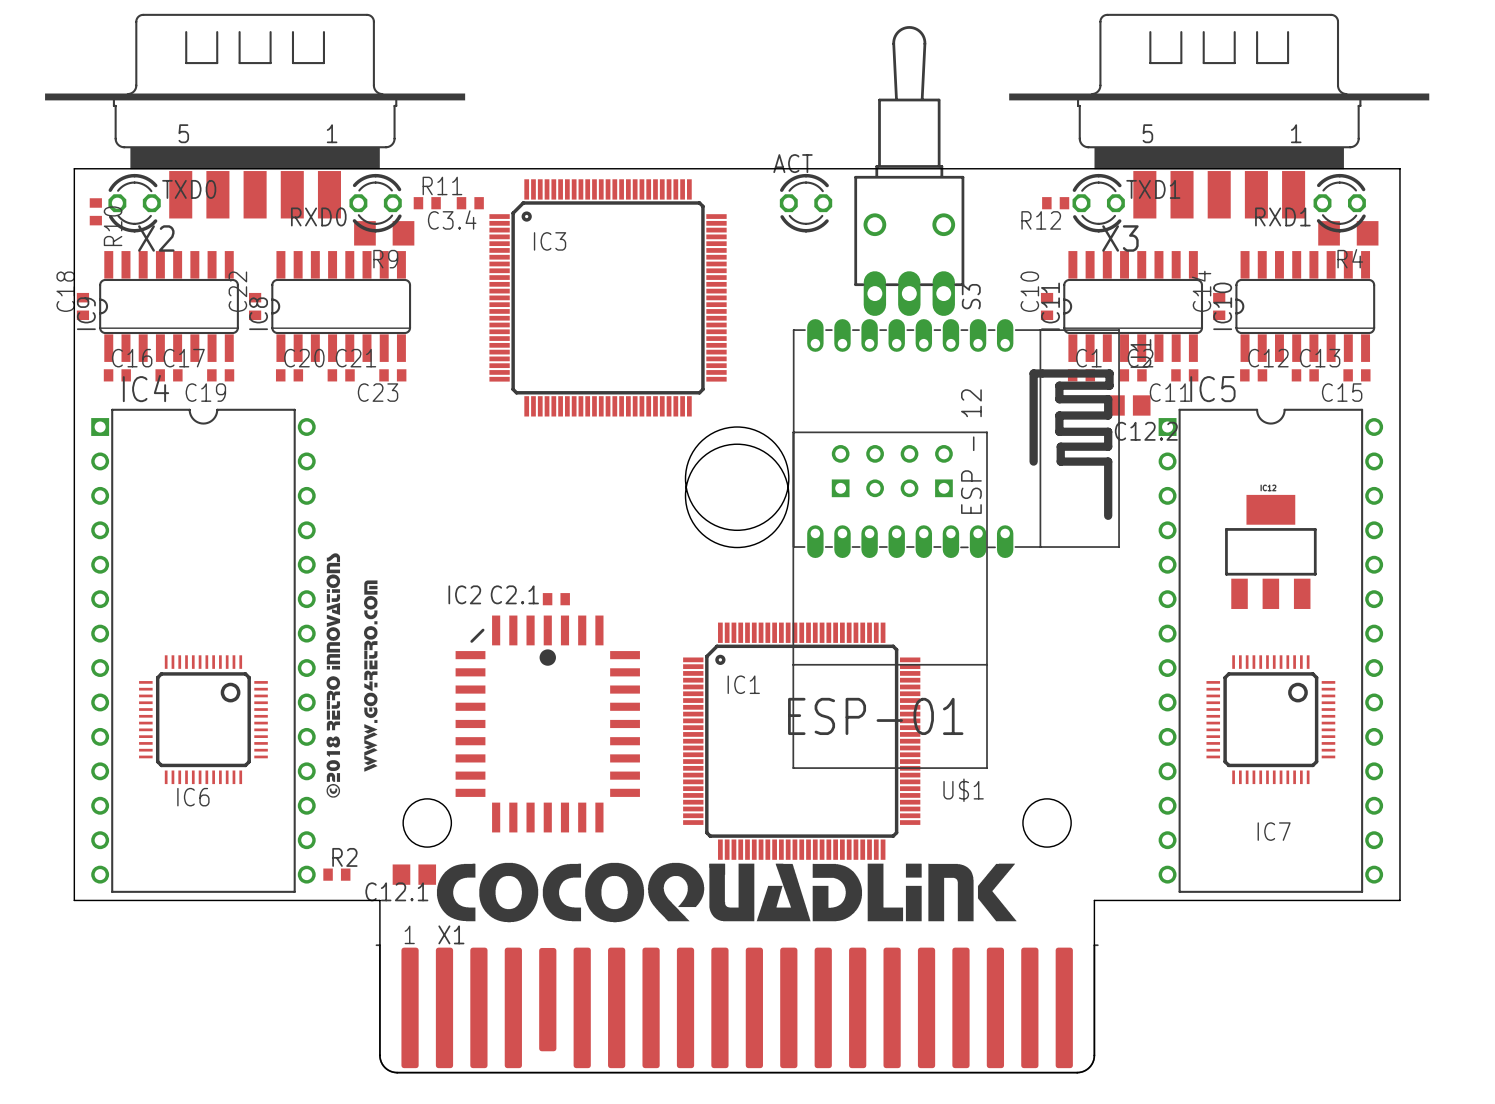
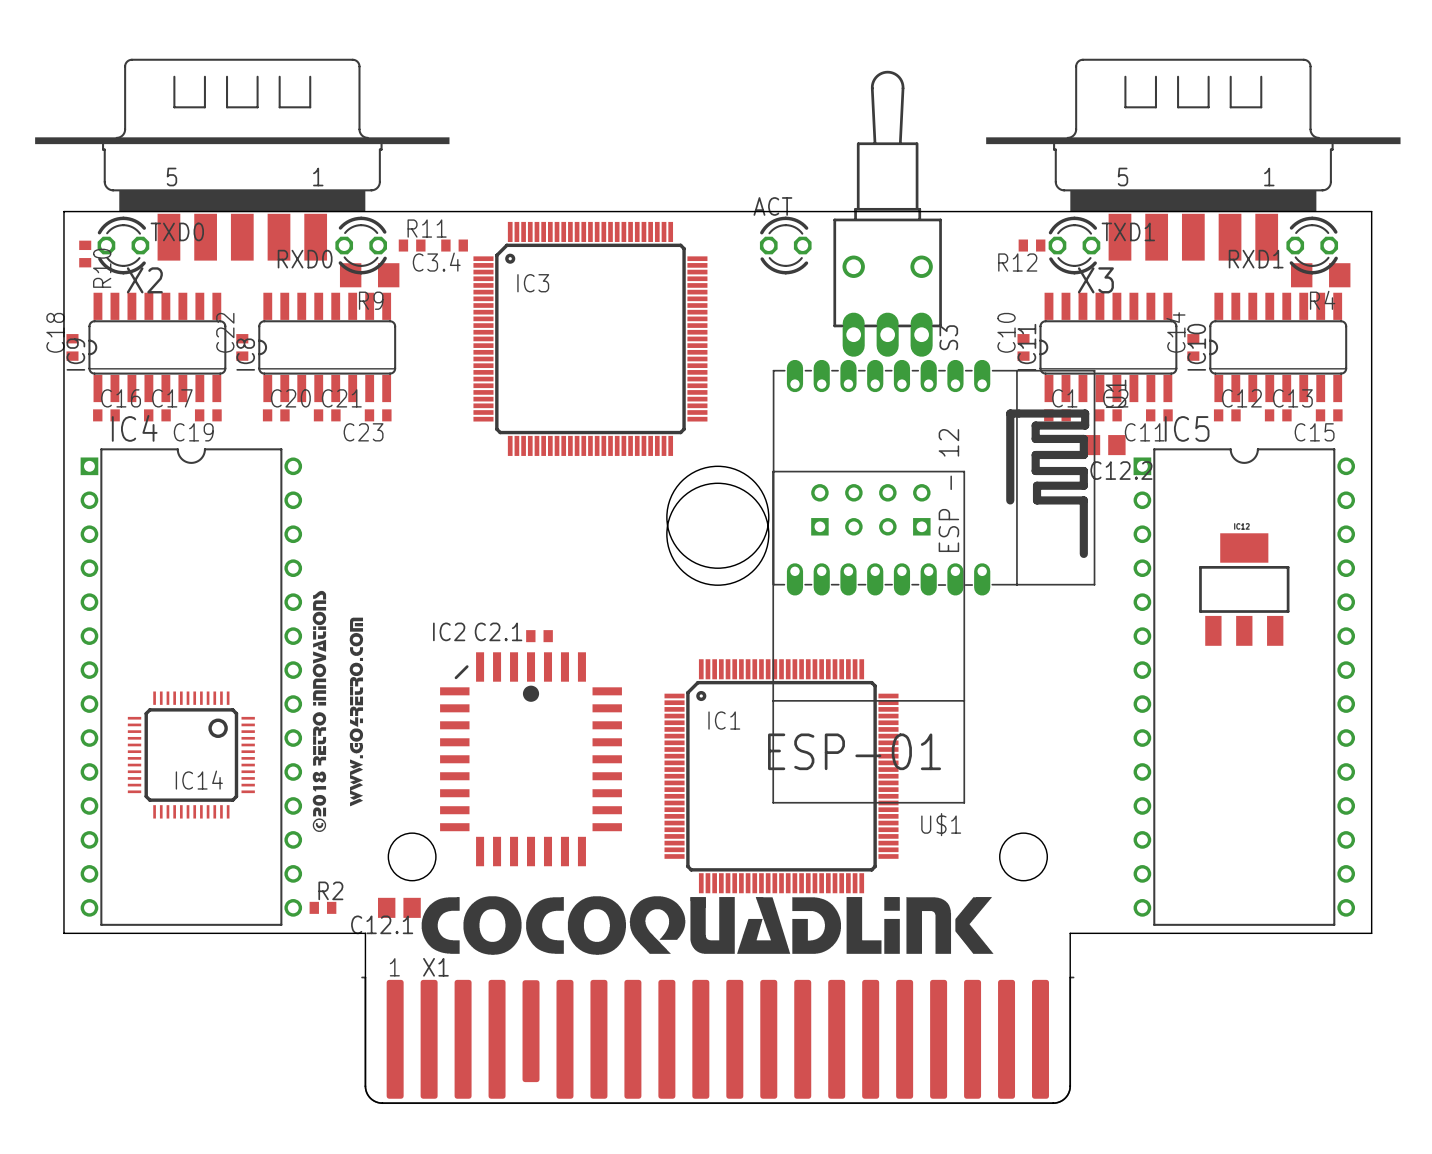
IC7: (1270, 719) -> none
IC6 name: IC6 (193, 797) -> IC14 (199, 780)

